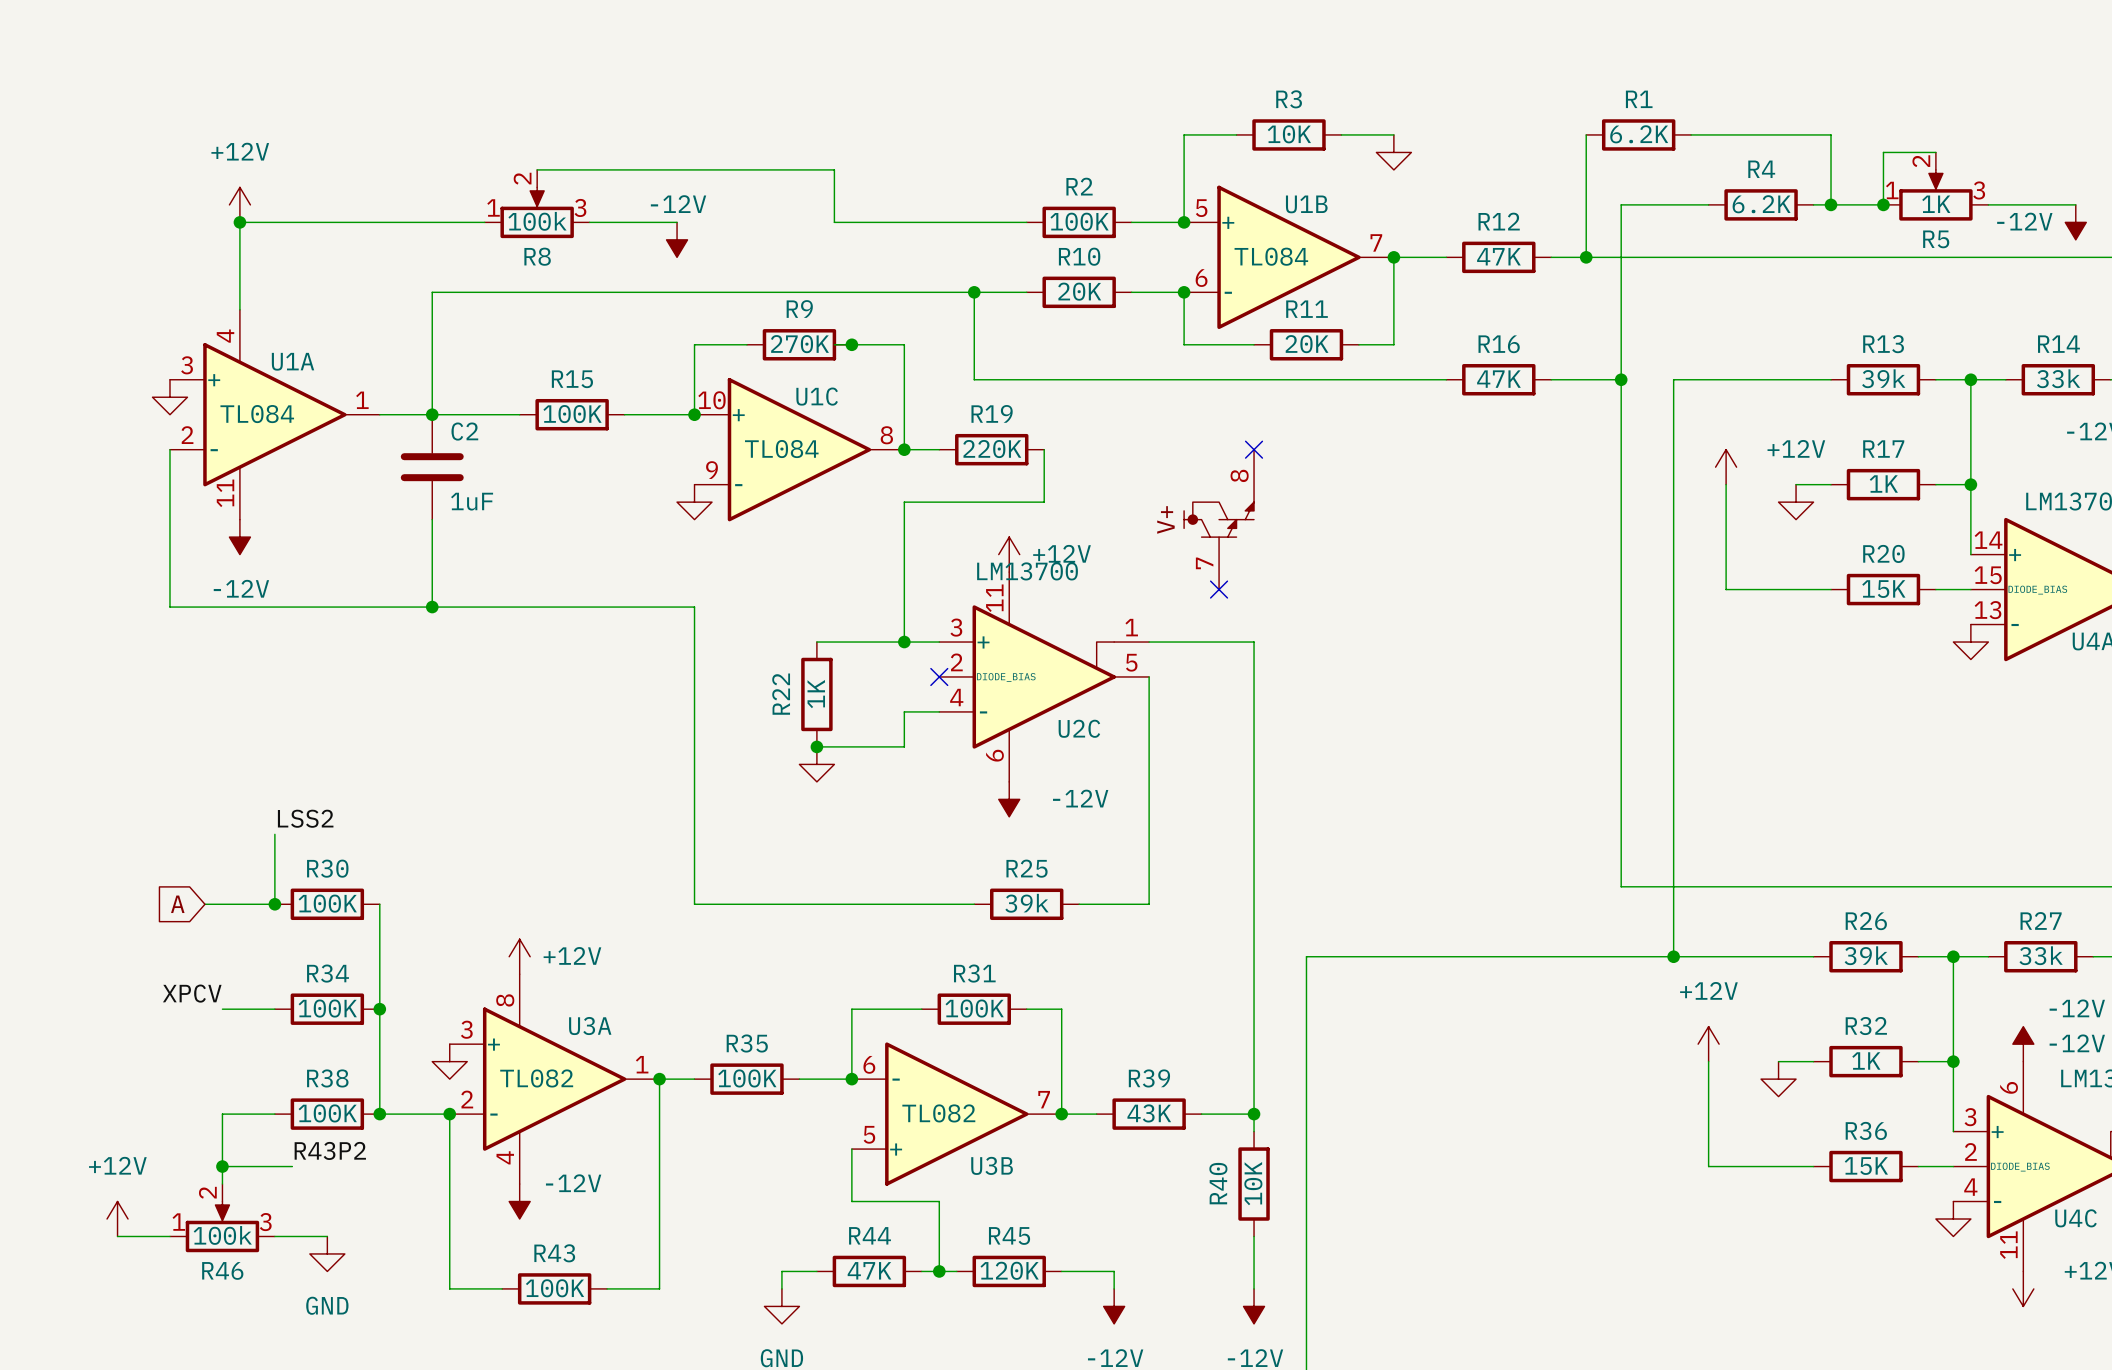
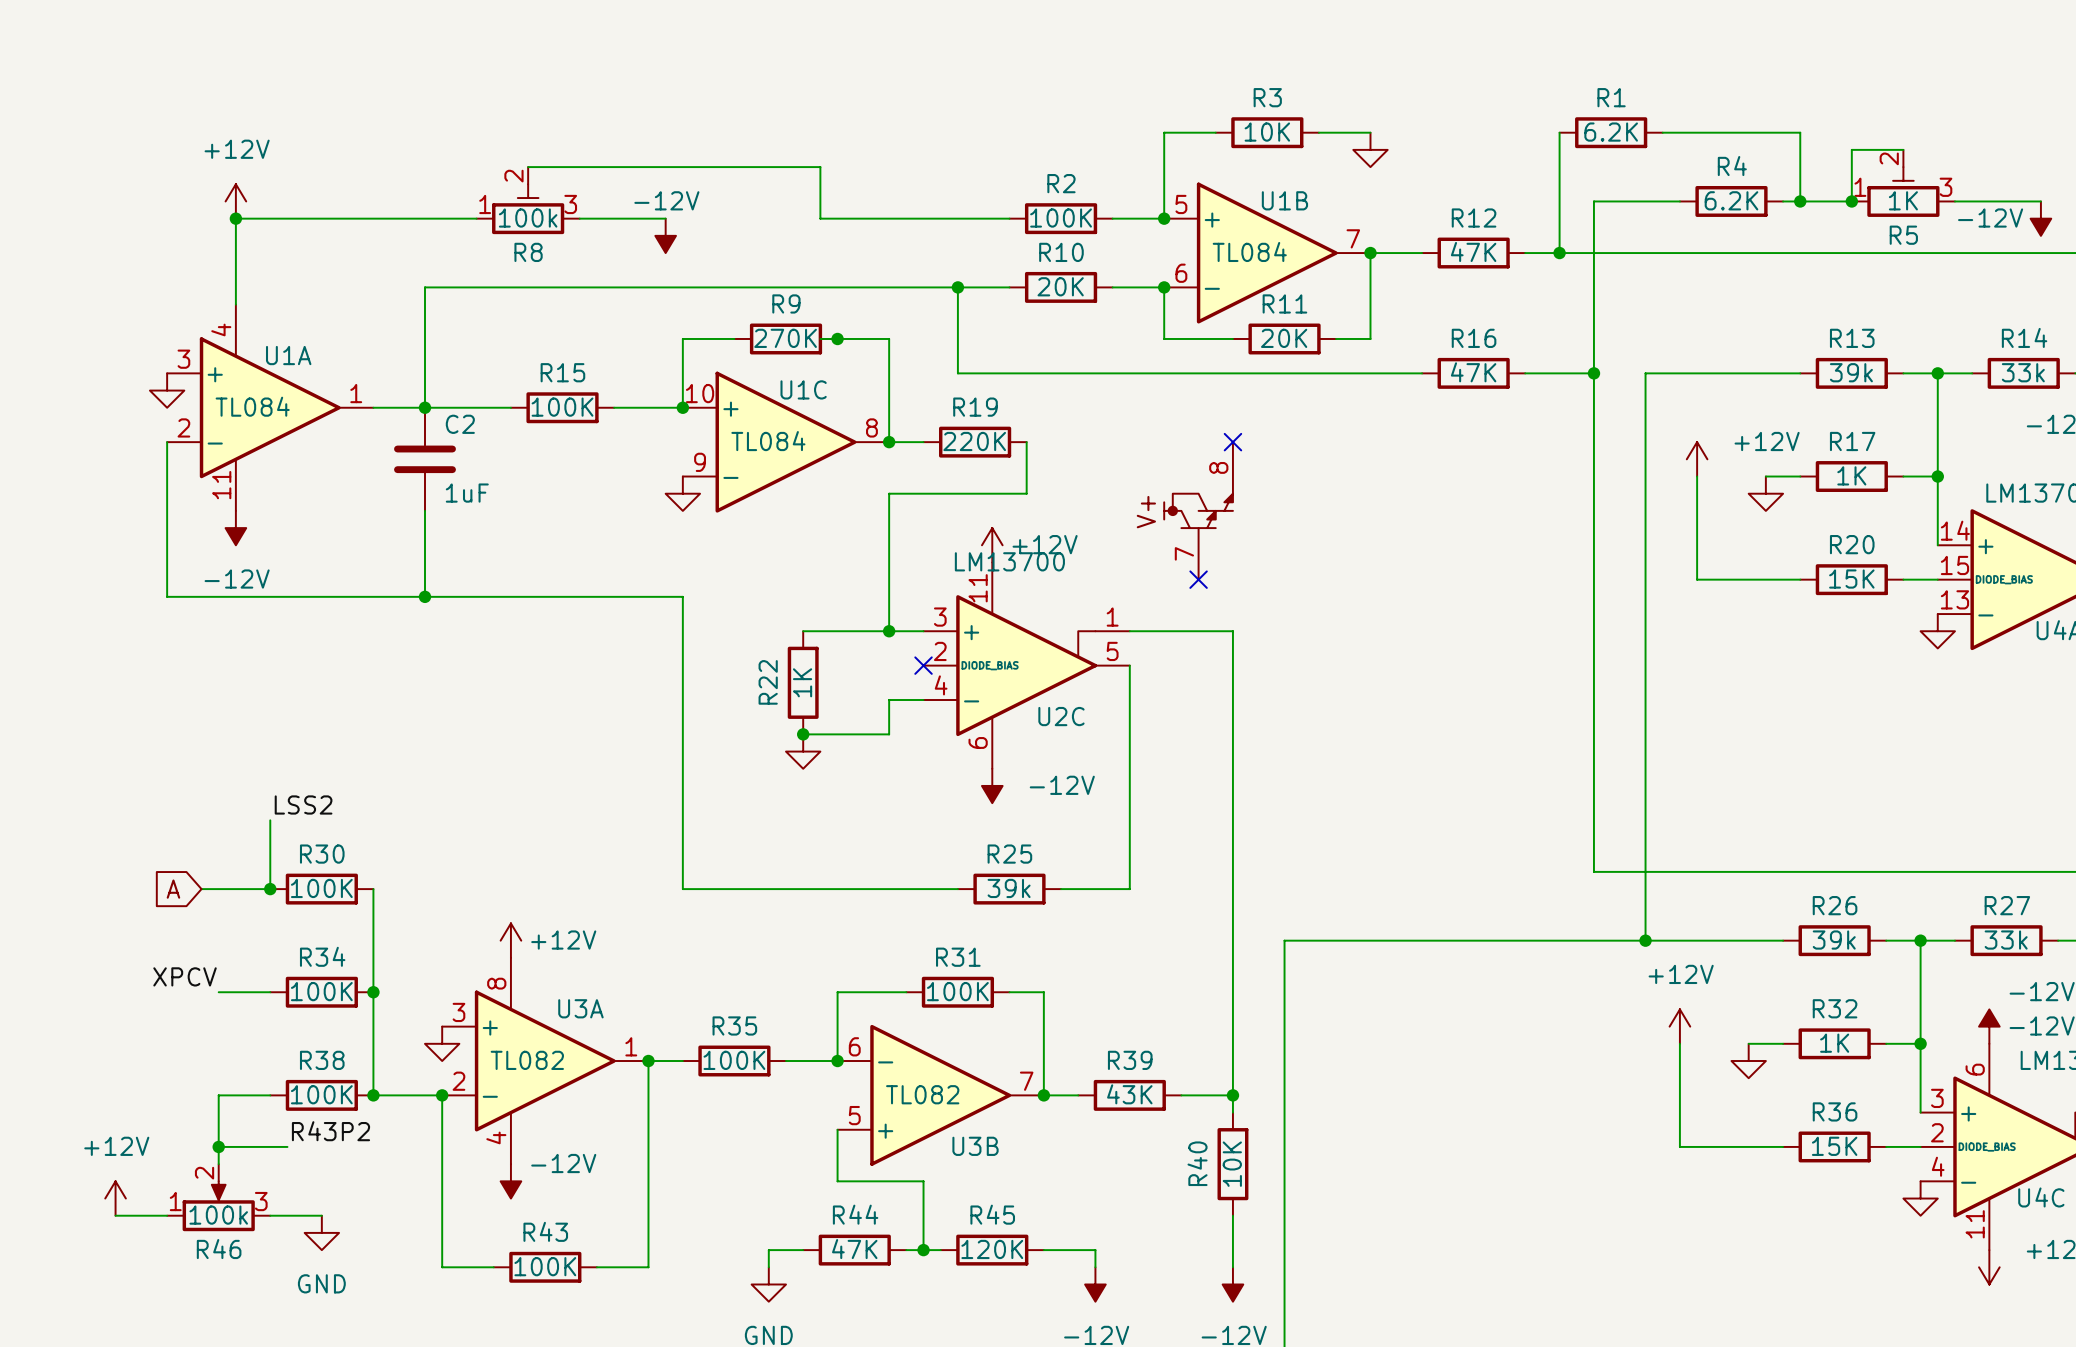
R5 symbol: [1883, 152, 1989, 221] -> [1851, 149, 1955, 217]
R8 symbol: [484, 169, 590, 239] -> [476, 167, 580, 235]

